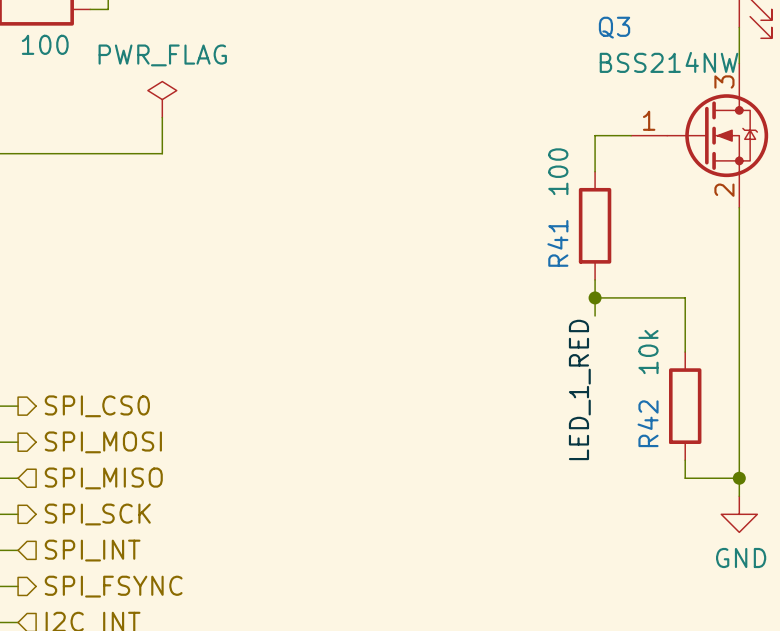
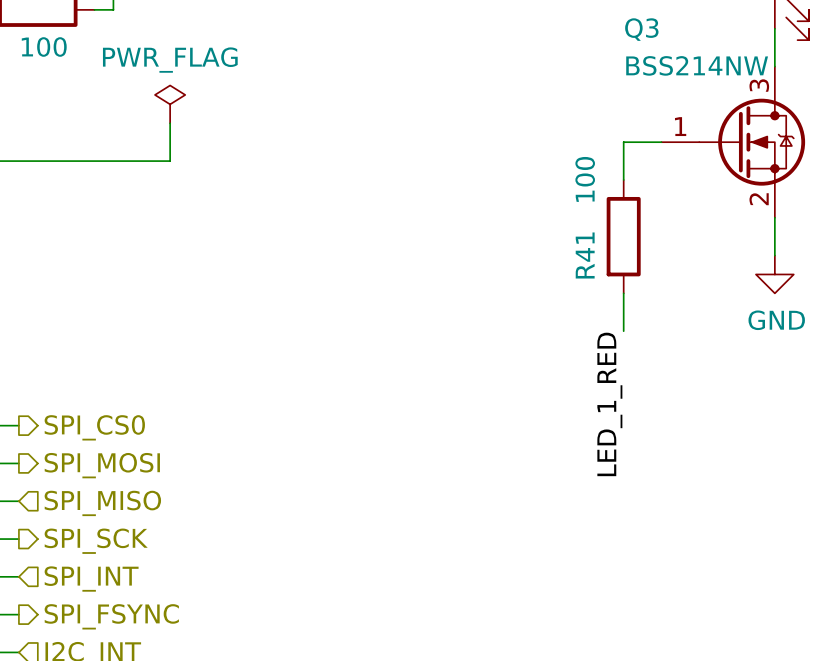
wire: (739, 243) (739, 496) -> none
wire: (595, 297) (685, 297) (685, 352) -> none
junction: (595, 297) -> none
R42: 10k (685, 406) -> none
wire: (685, 460) (685, 478) (739, 478) -> none
junction: (739, 478) -> none
power symbol position: GND (739, 514) -> GND (774, 274)

